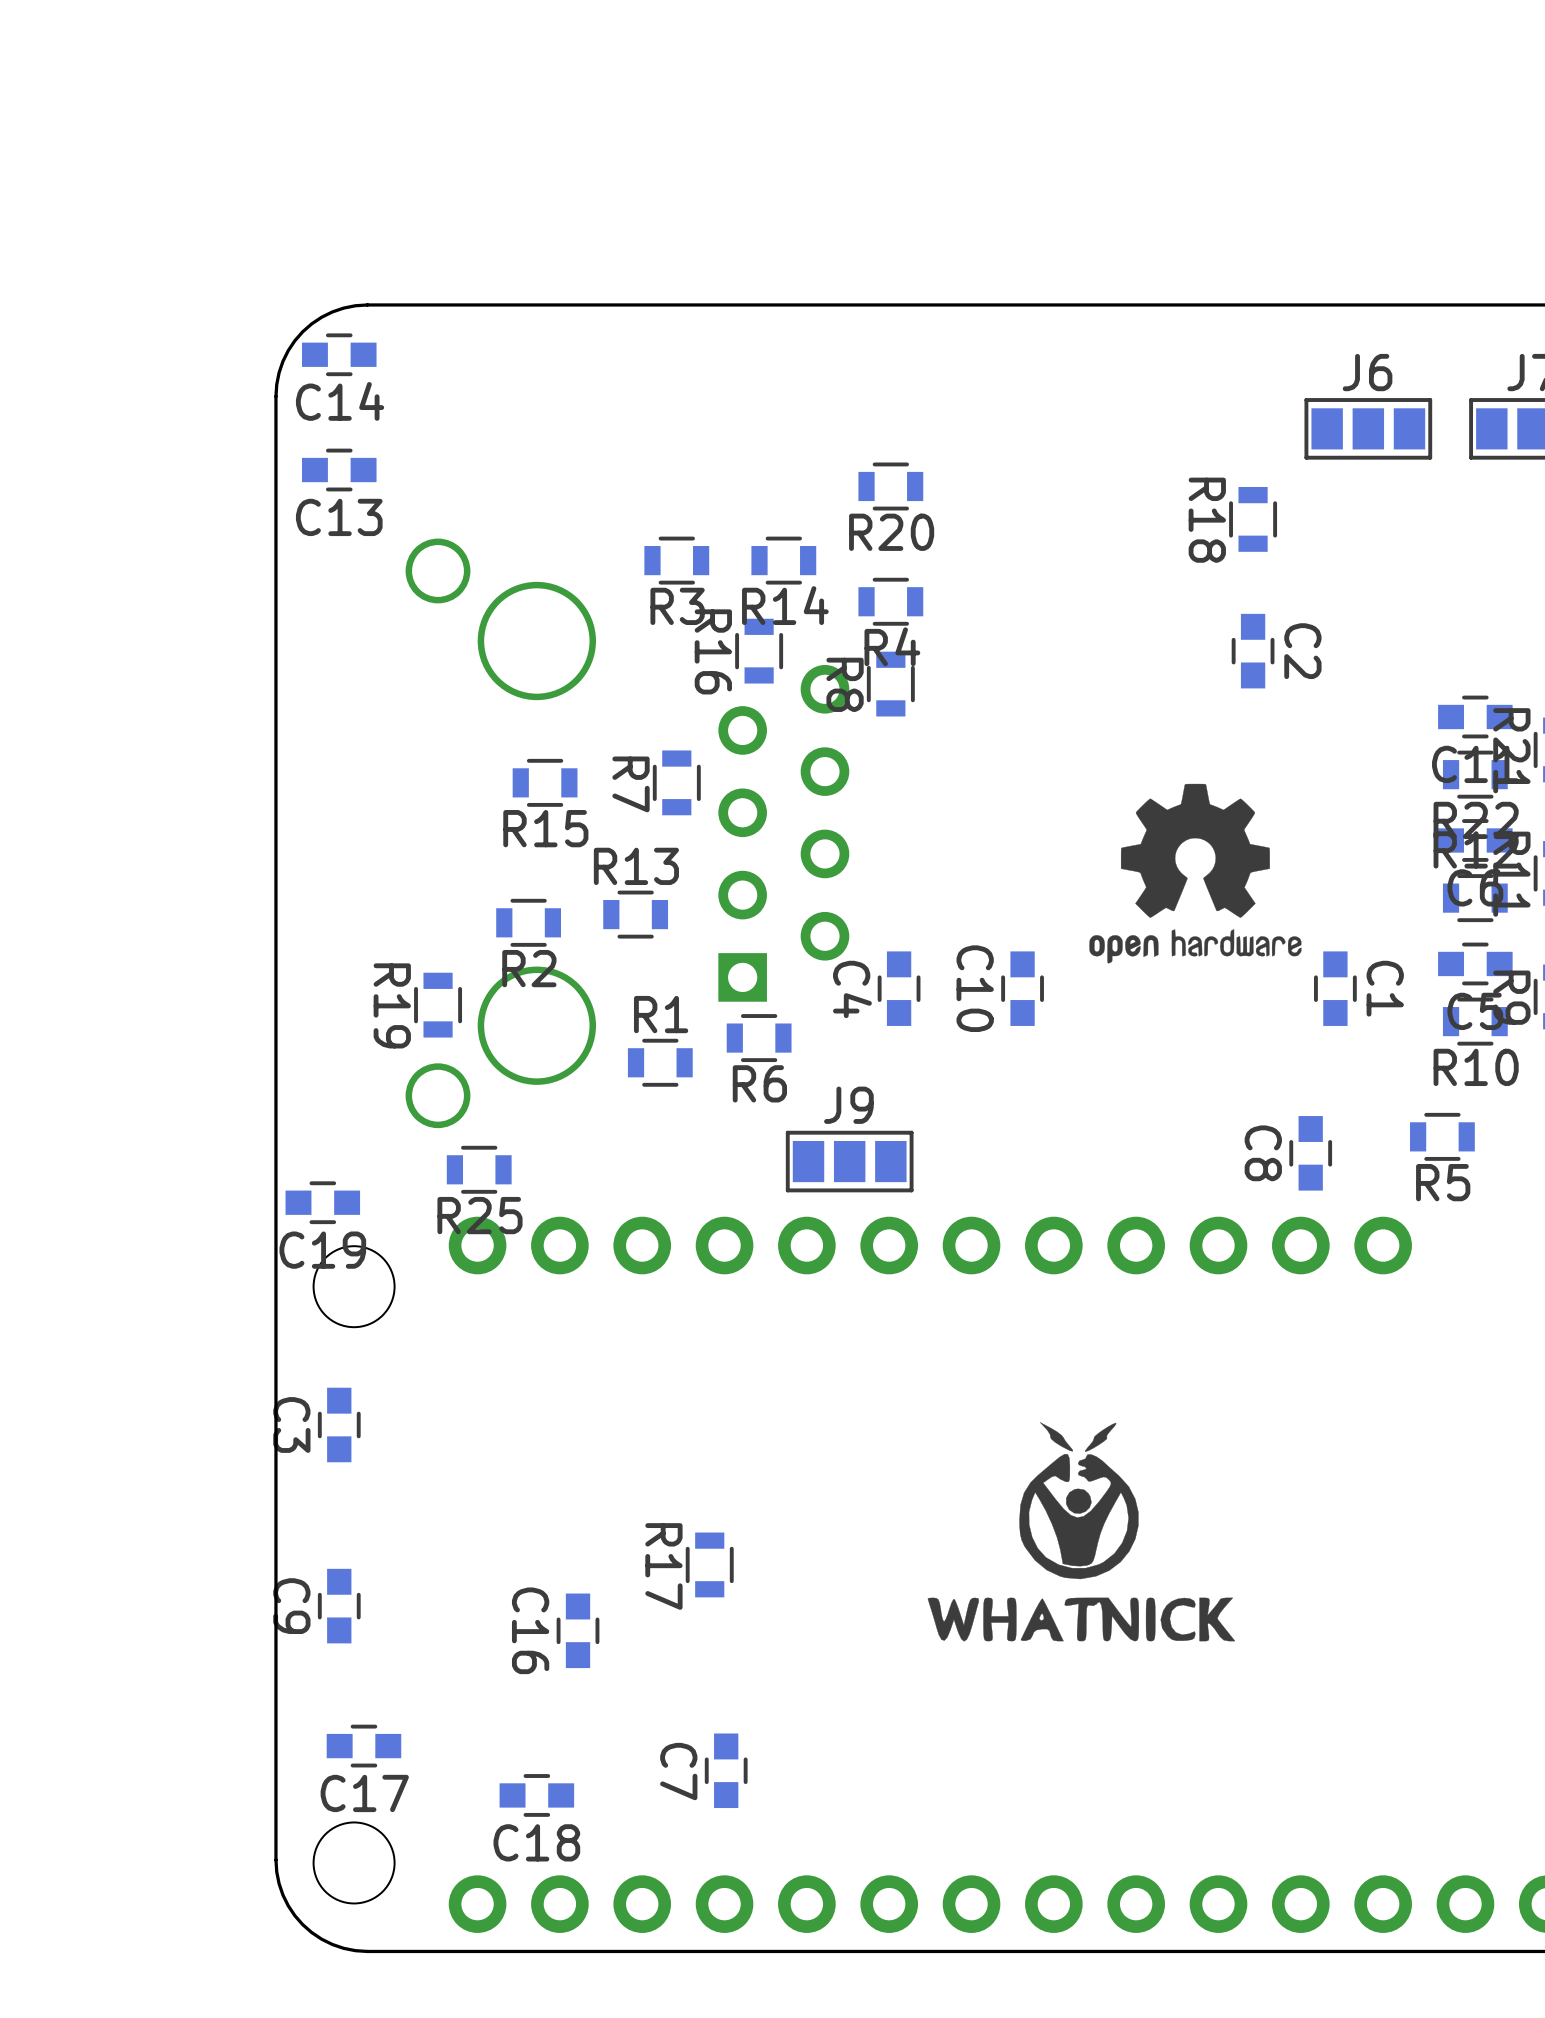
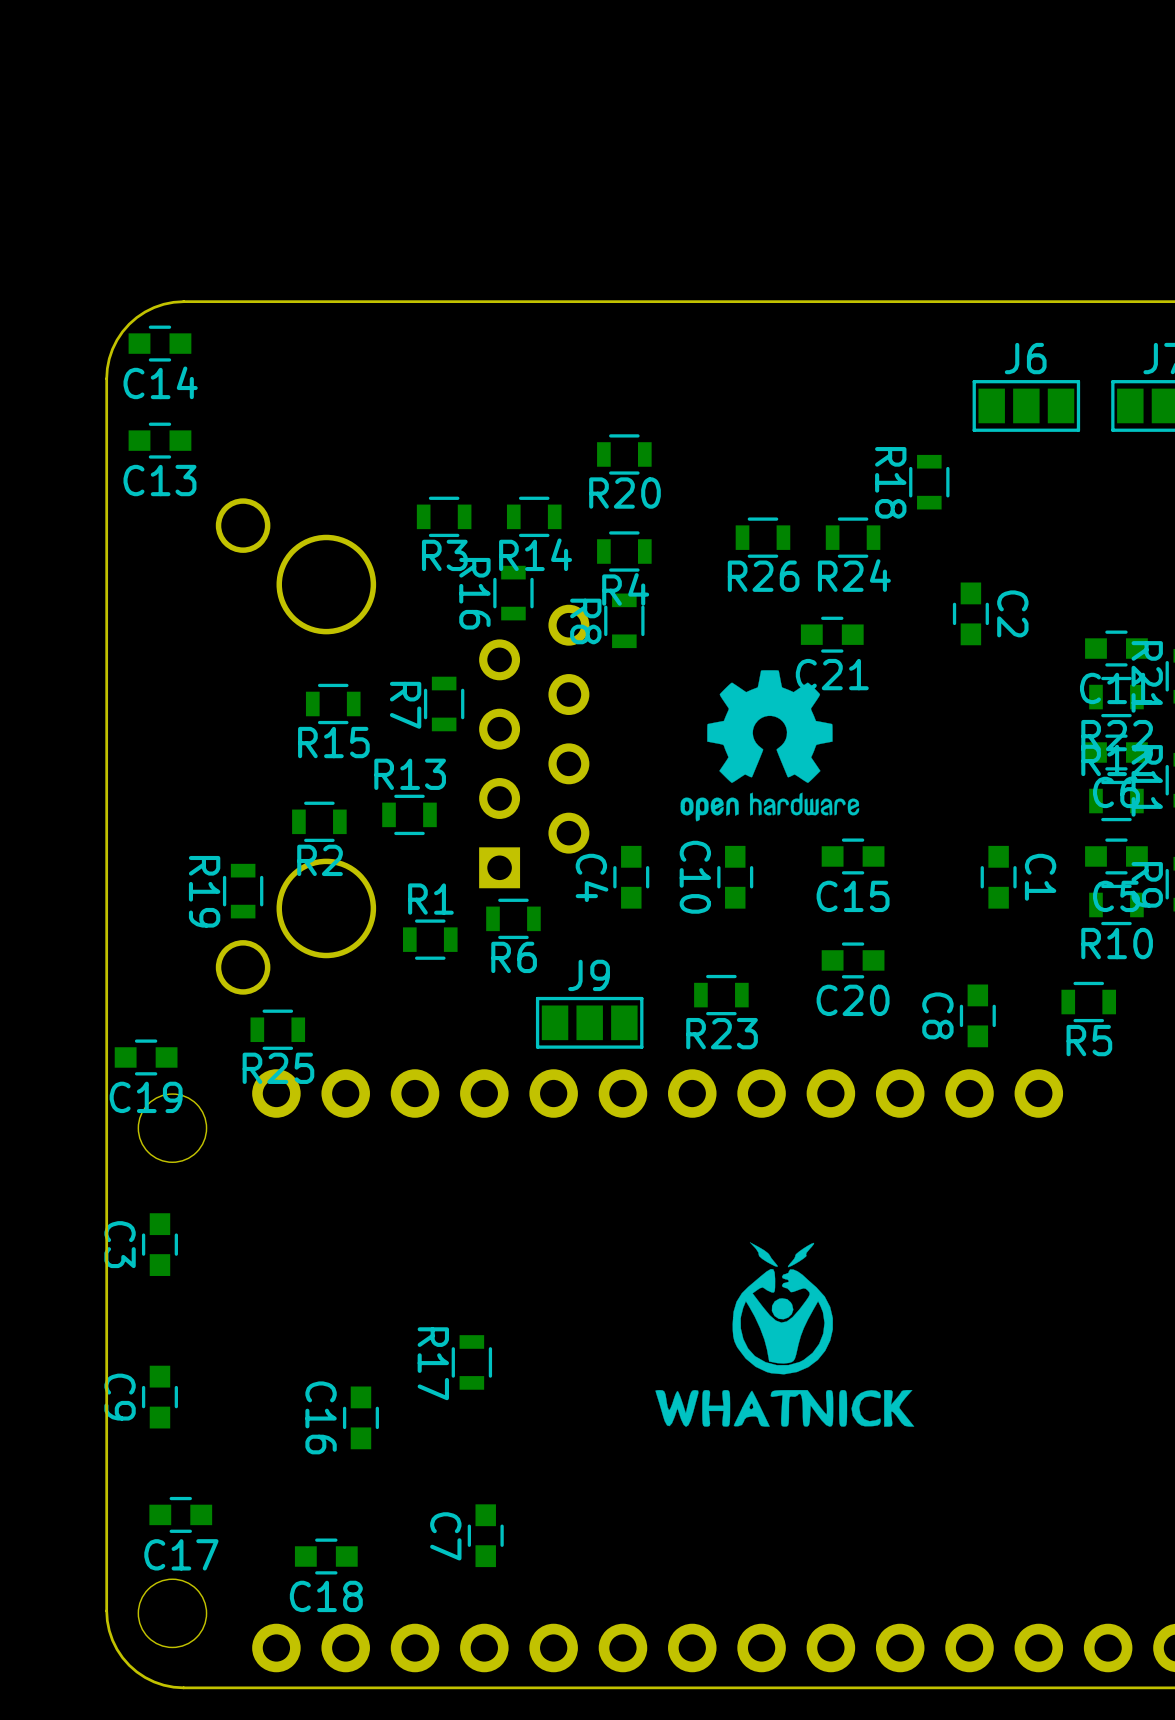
R26: none -> (762, 537)
R24: none -> (853, 537)
C2 position: (1253, 651) -> (970, 613)
C21: none -> (832, 634)
drawing position: (1195, 873) -> (769, 745)
C15: none -> (853, 856)
C20: none -> (853, 960)
R23: none -> (721, 995)

